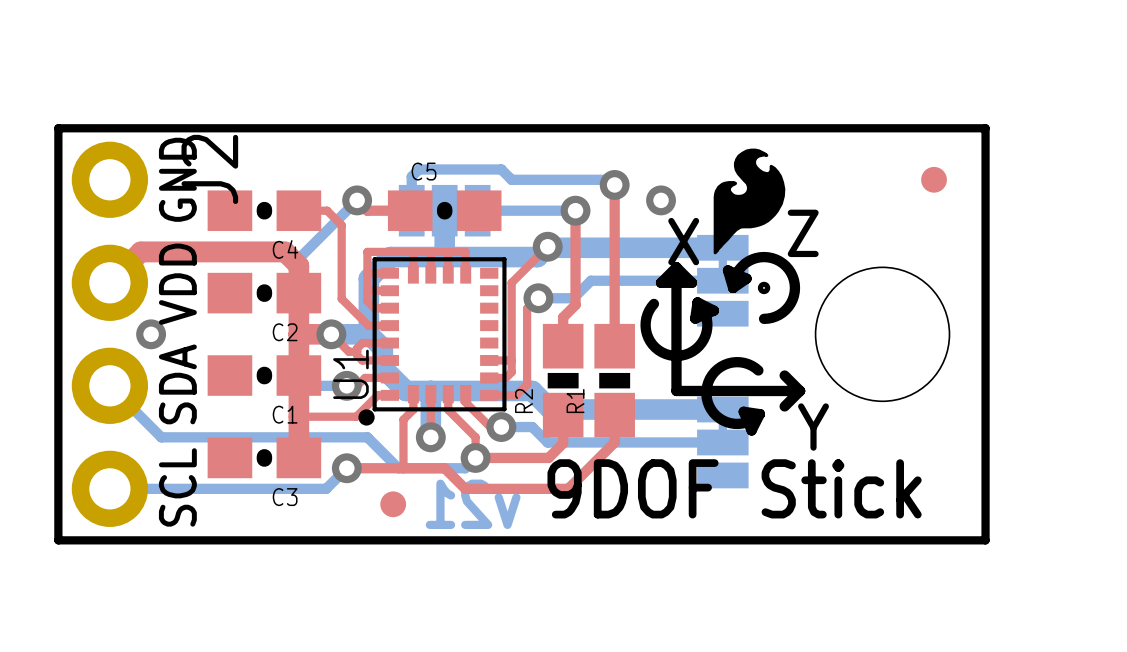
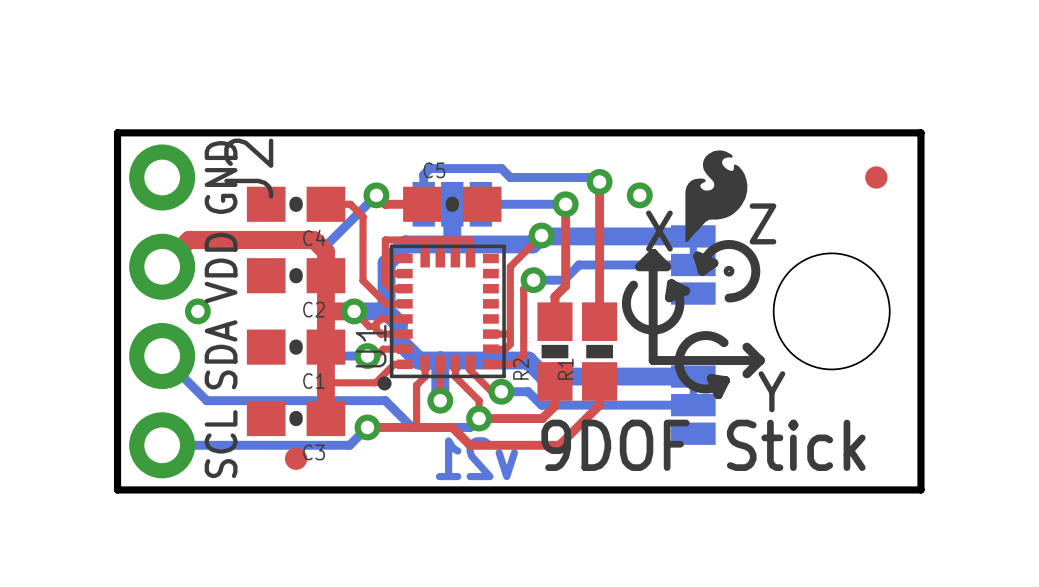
part position: (393, 504) -> (296, 458)

